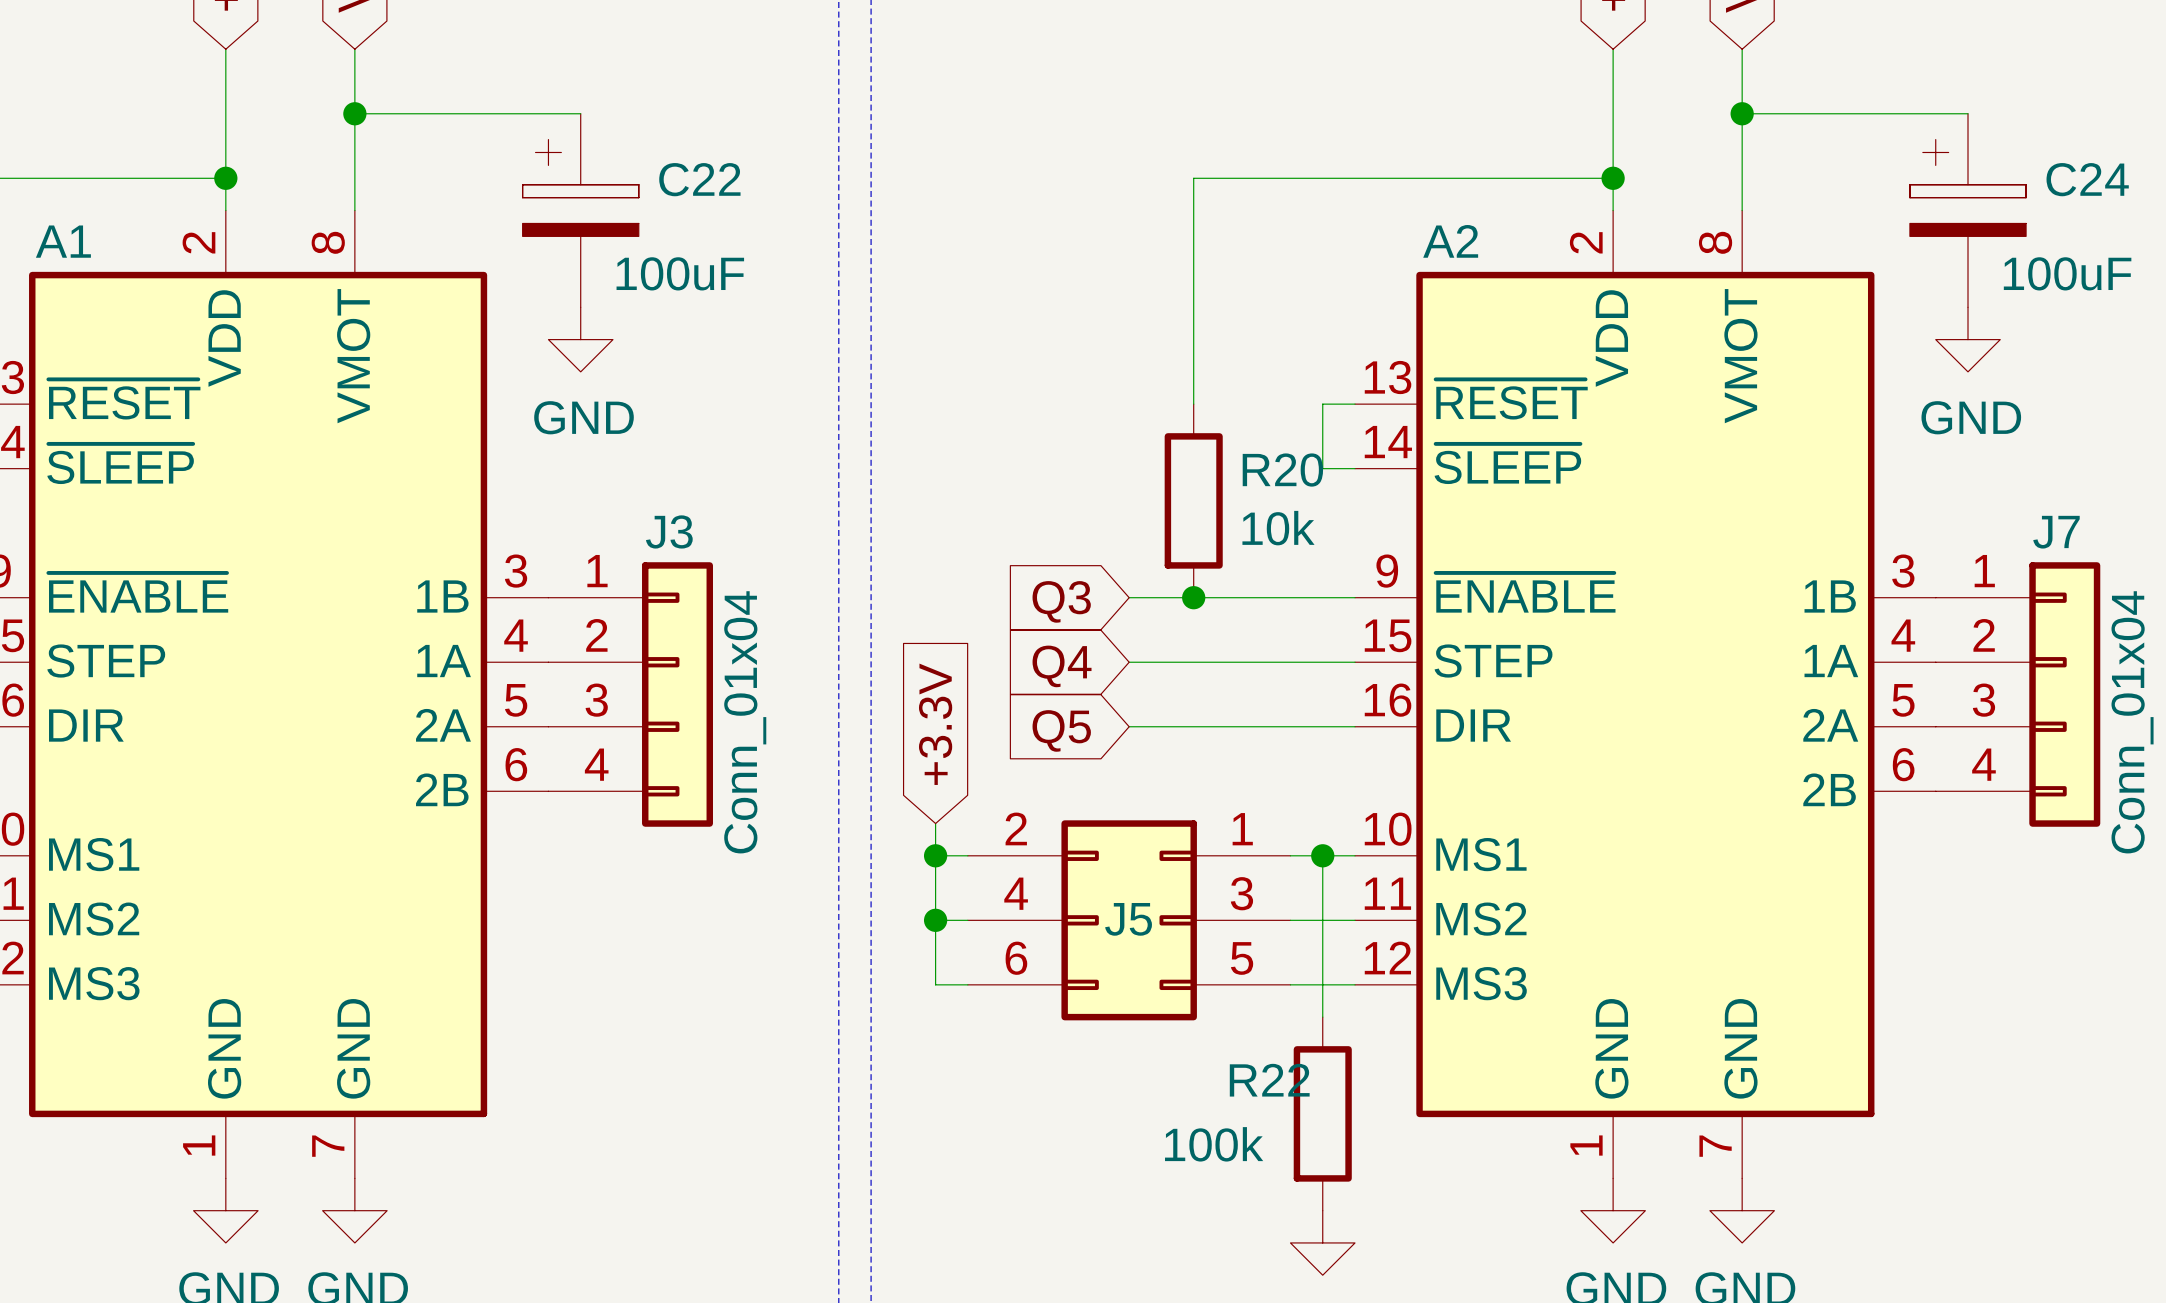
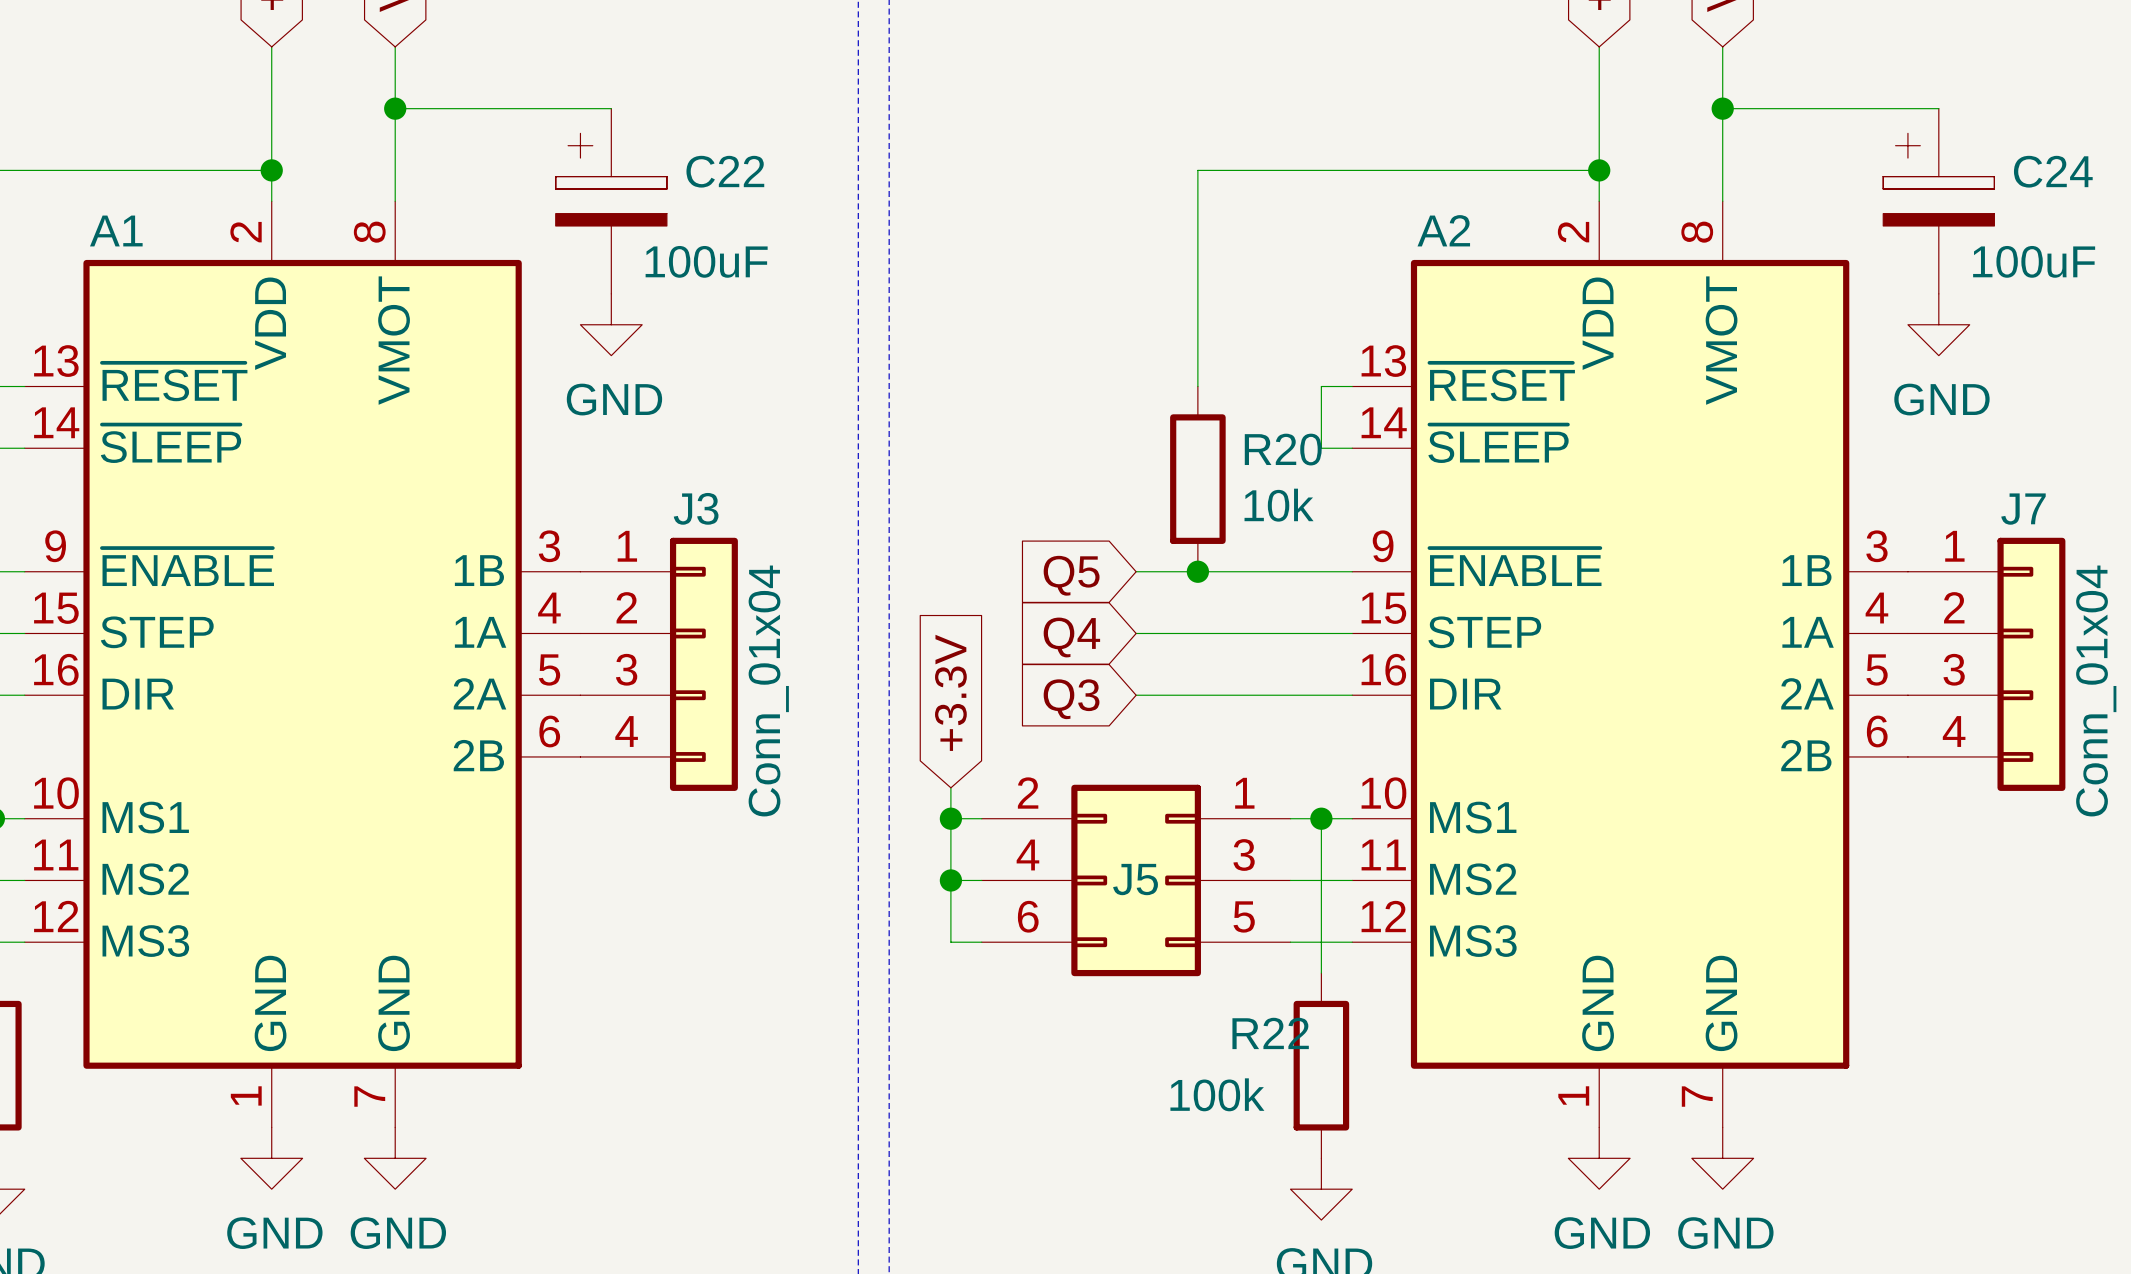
global label: Q3 (1061, 601) -> Q5 (1071, 575)
global label: Q5 (1061, 730) -> Q3 (1071, 699)

